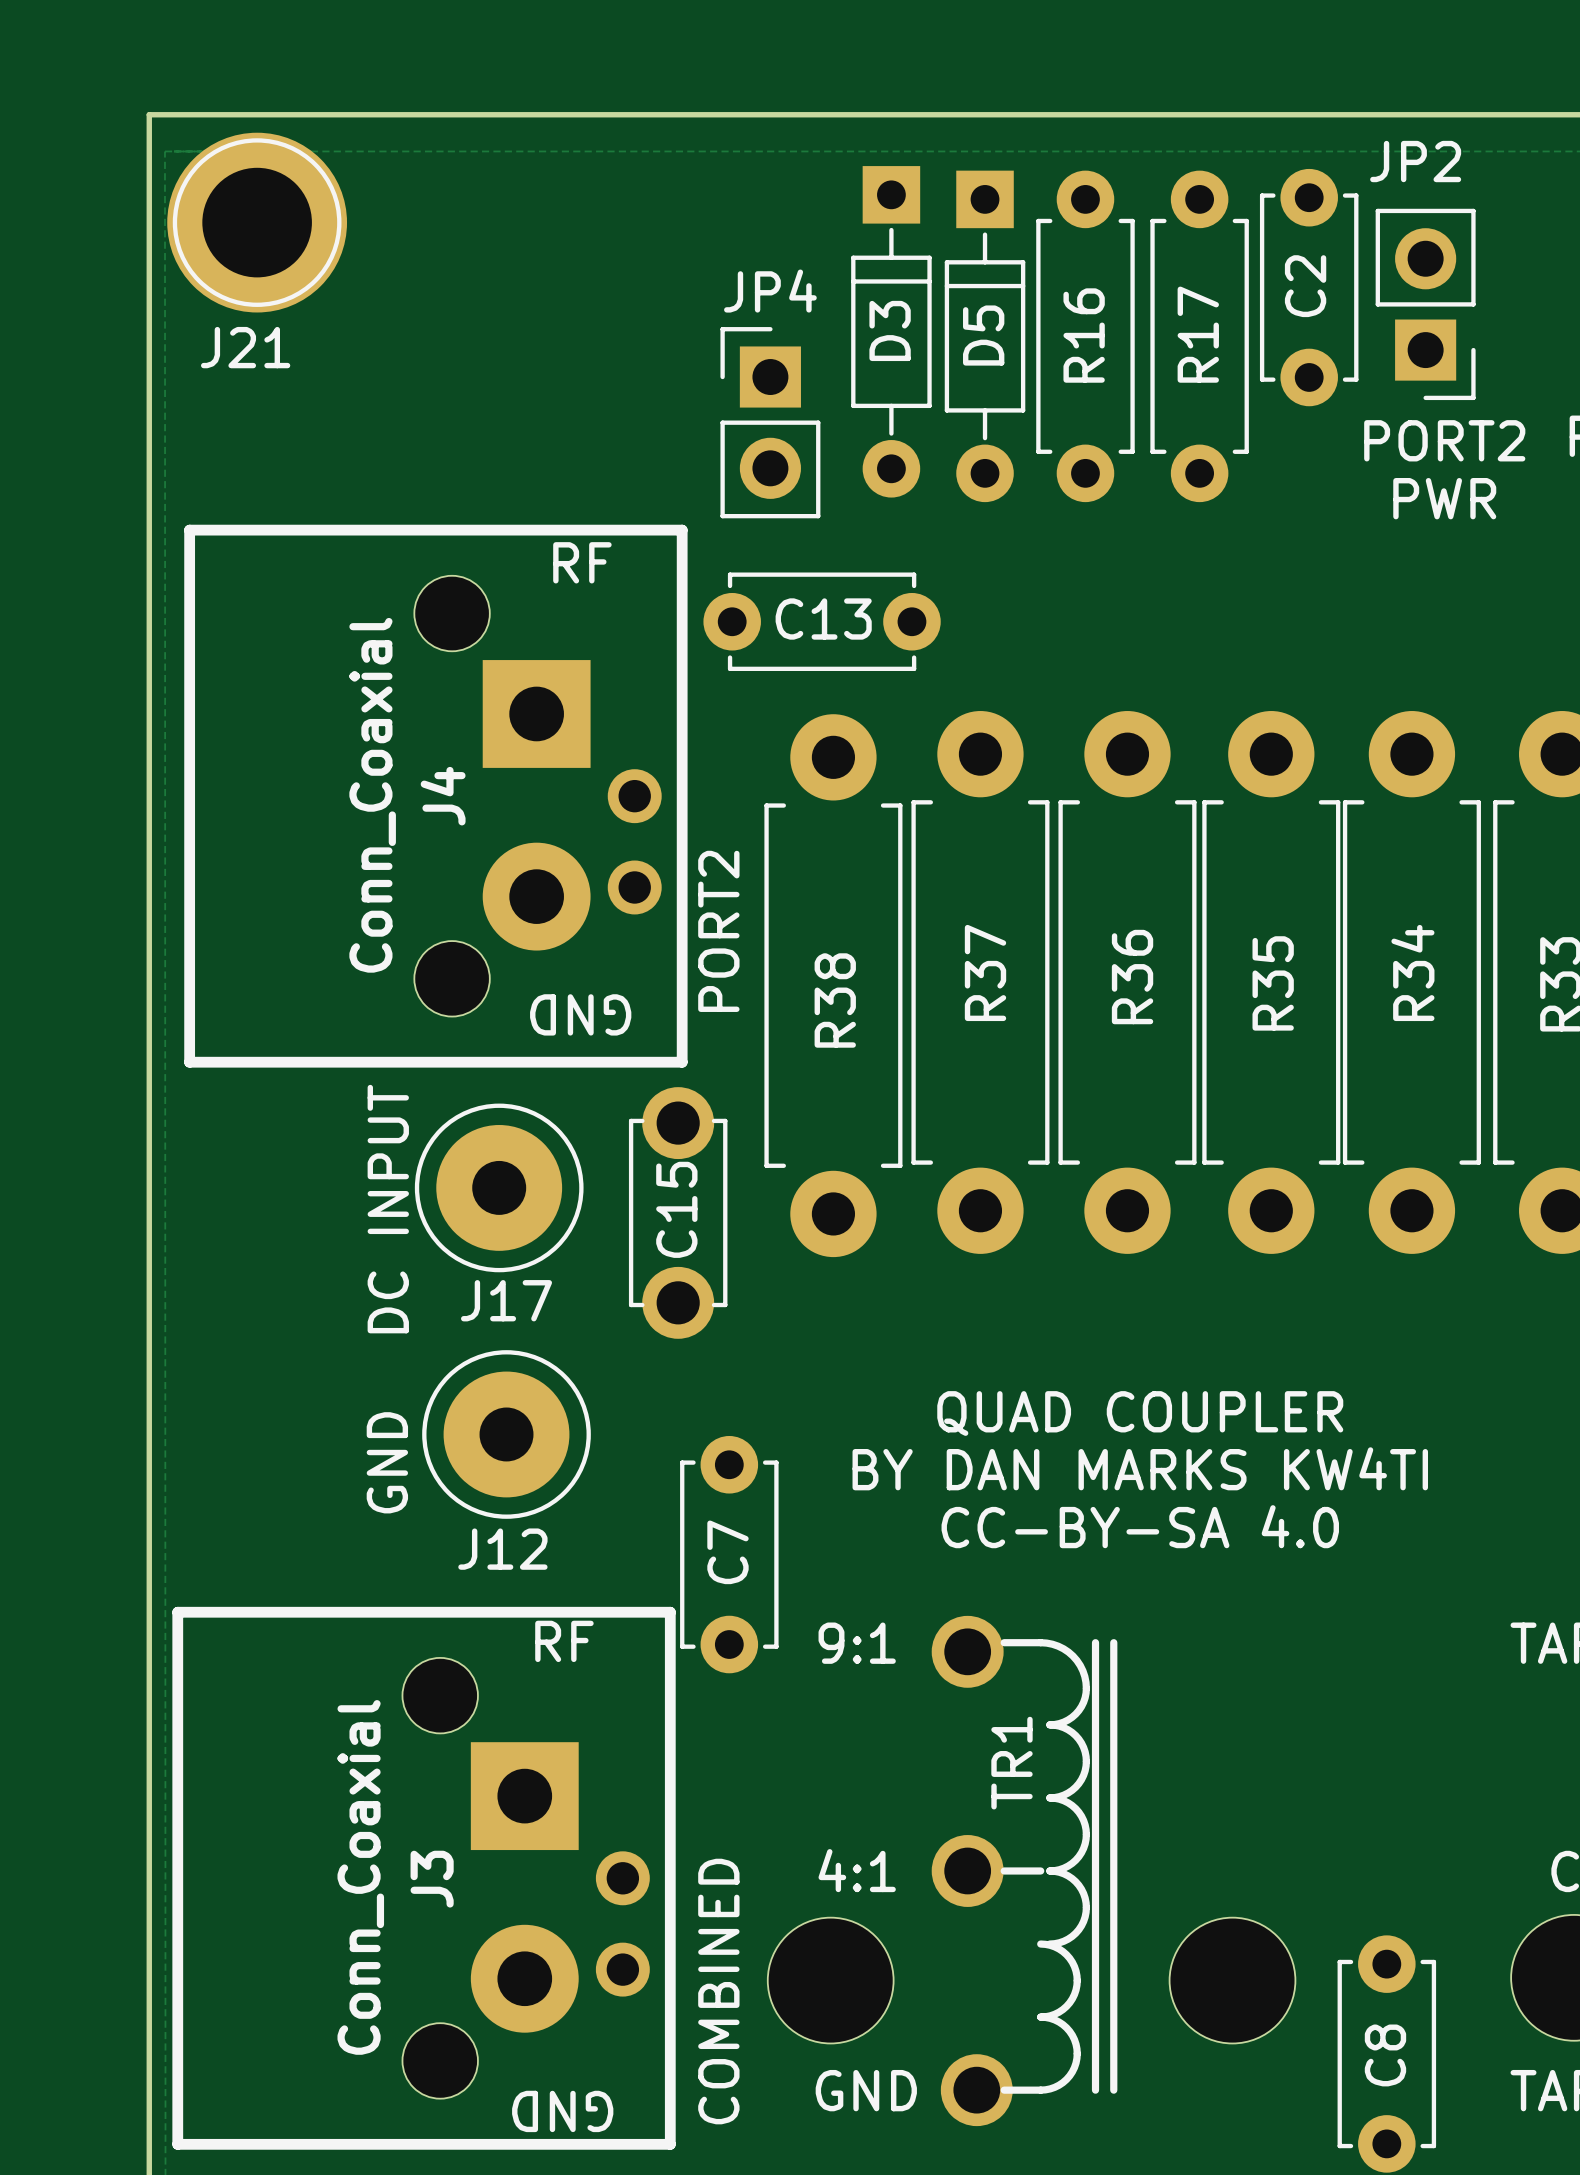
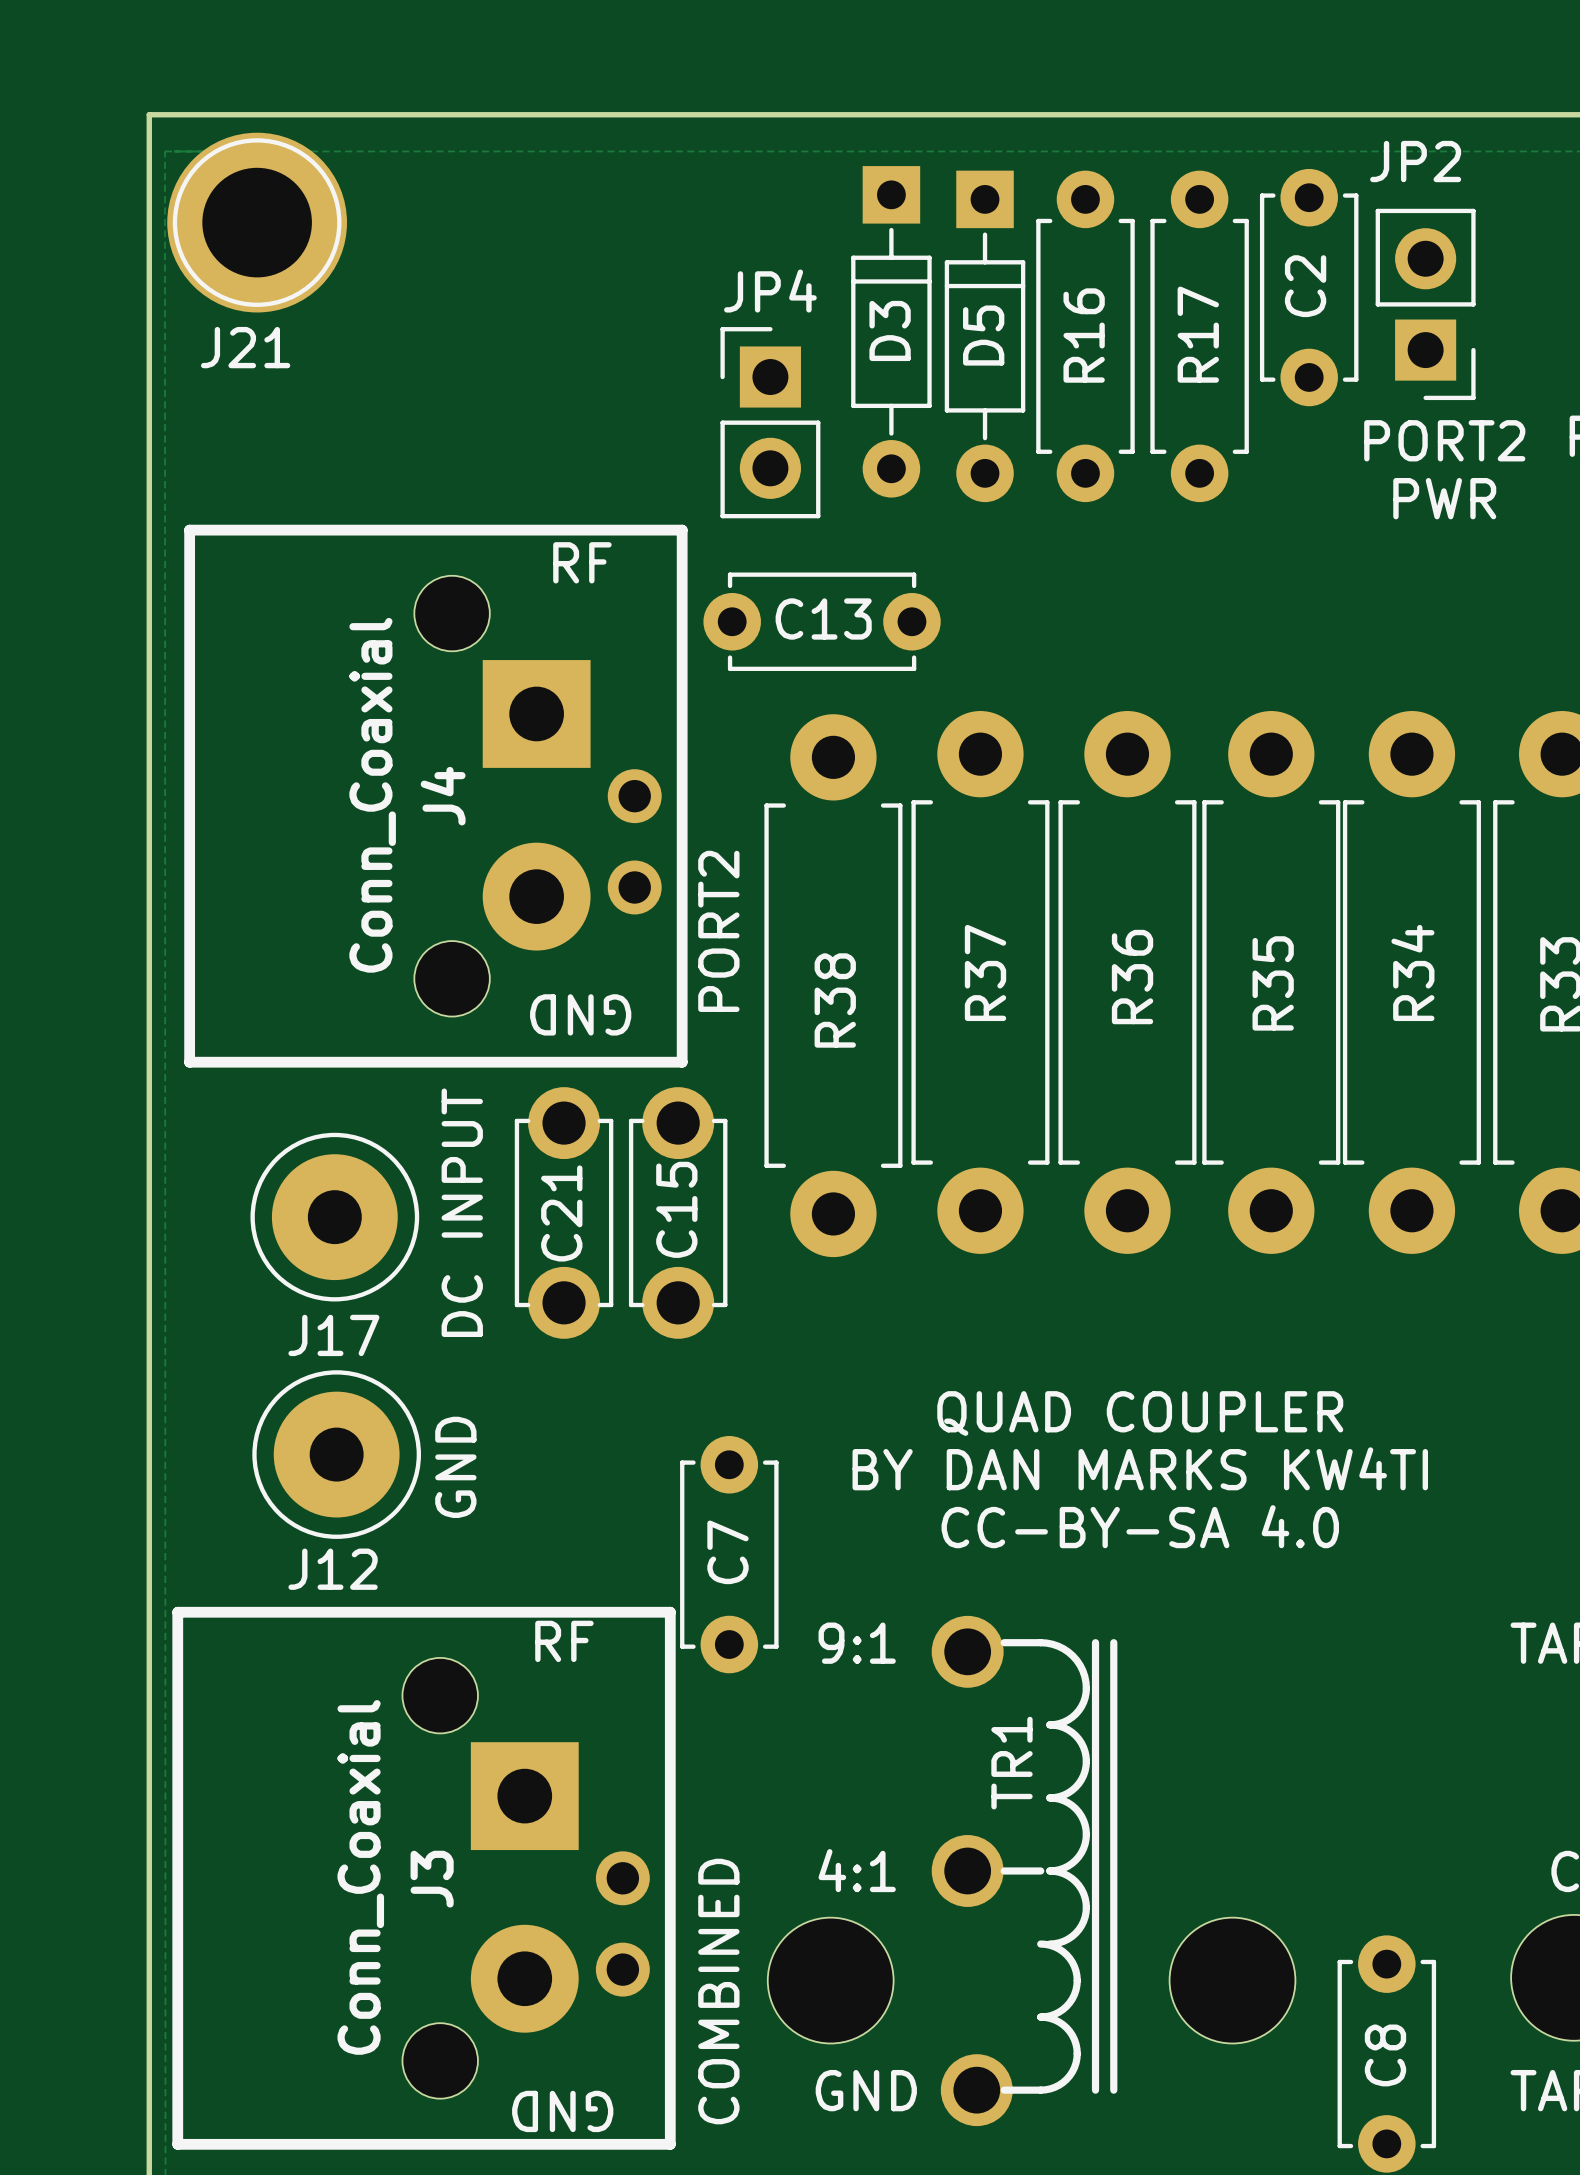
J17 position: (499, 1187) -> (334, 1217)
text position: DC INPUT (388, 1209) -> DC INPUT (462, 1212)
C21: none -> (564, 1212)
J17 name position: J17 (506, 1300) -> J17 (333, 1335)
J12 position: (506, 1434) -> (336, 1454)
text position: GND (387, 1462) -> GND (455, 1467)

